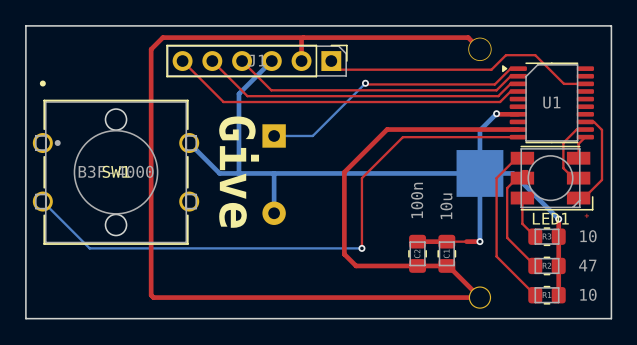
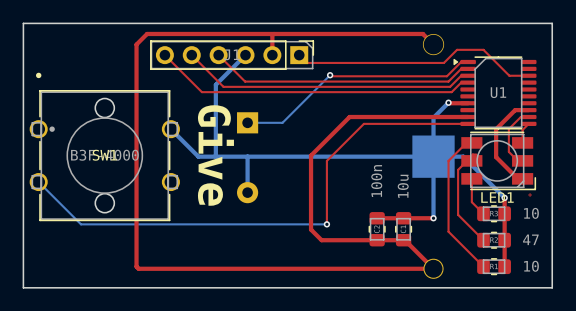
top track: (585, 121) (593, 121) (601, 129) (601, 179) (583, 198) -> (528, 110) (515, 110) (496, 129) (496, 157) (517, 178) (522, 178)

